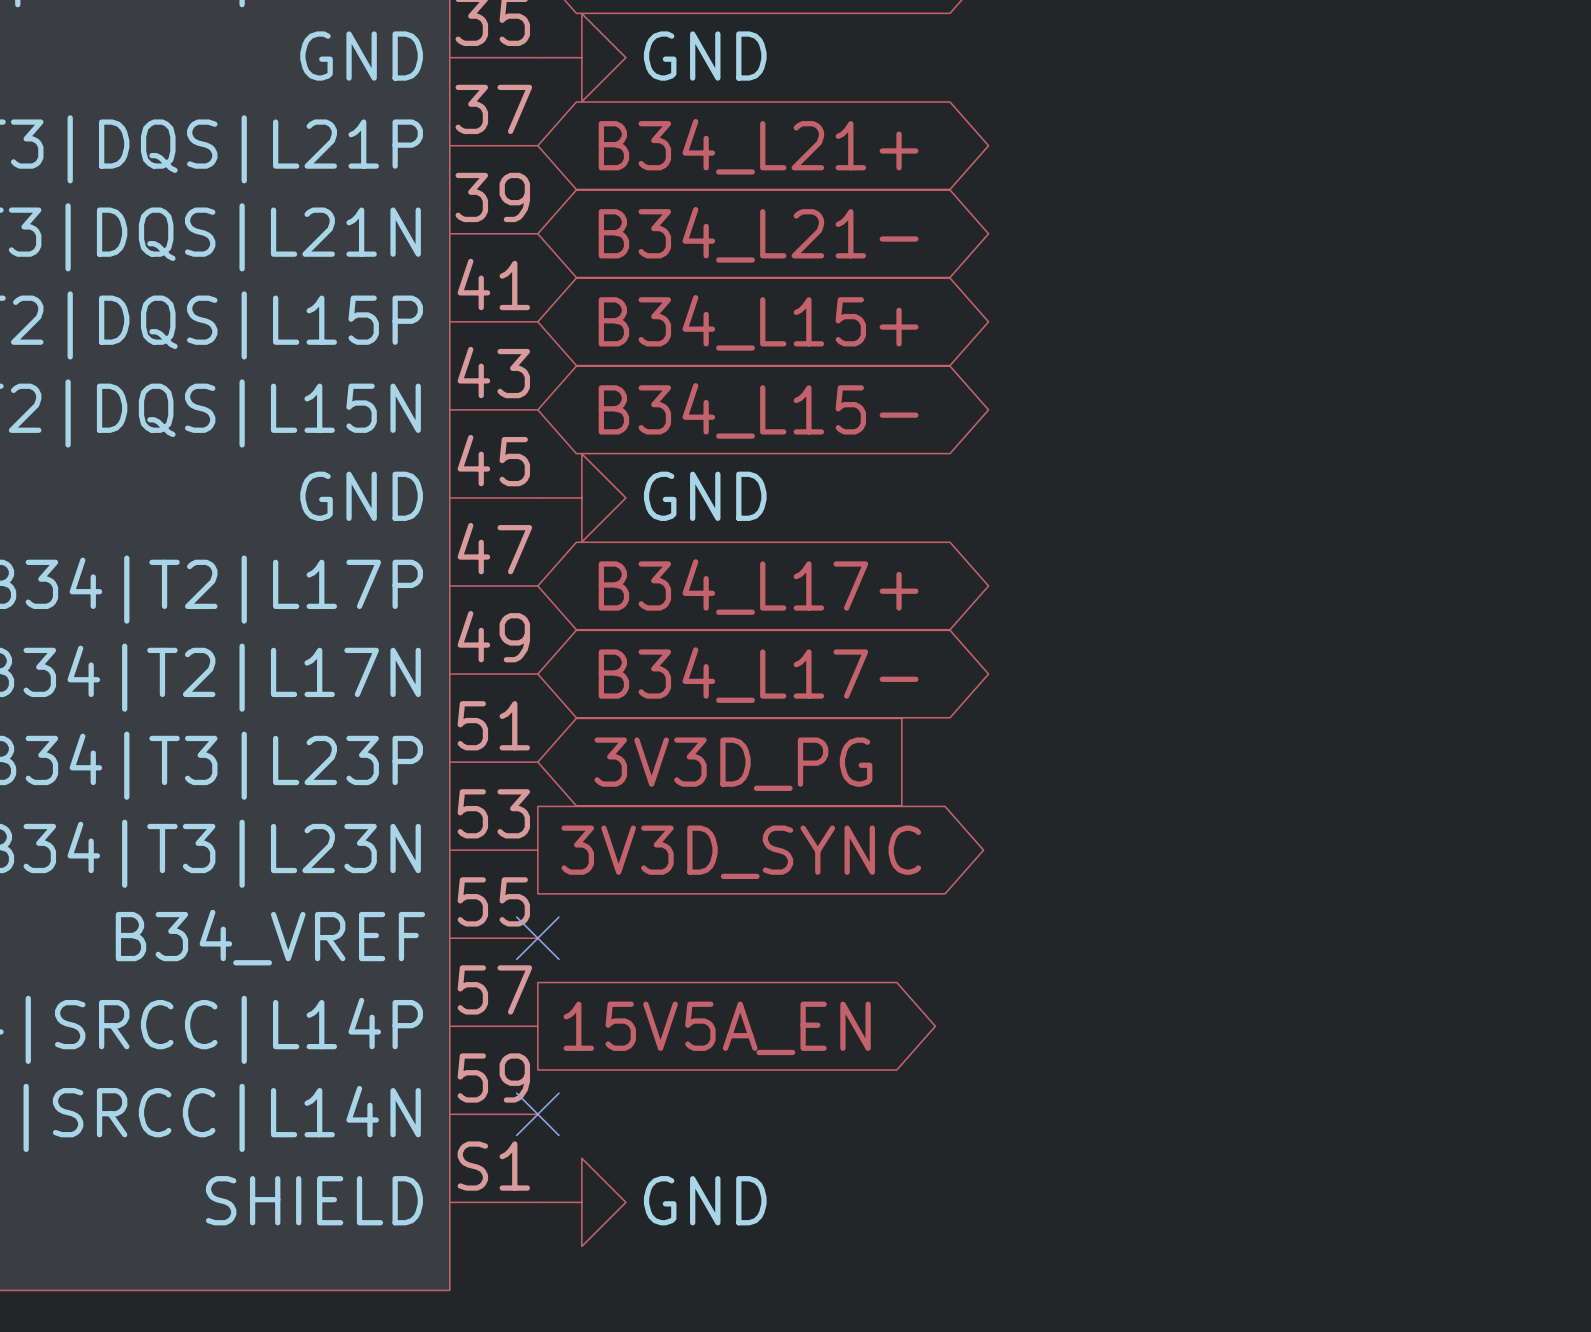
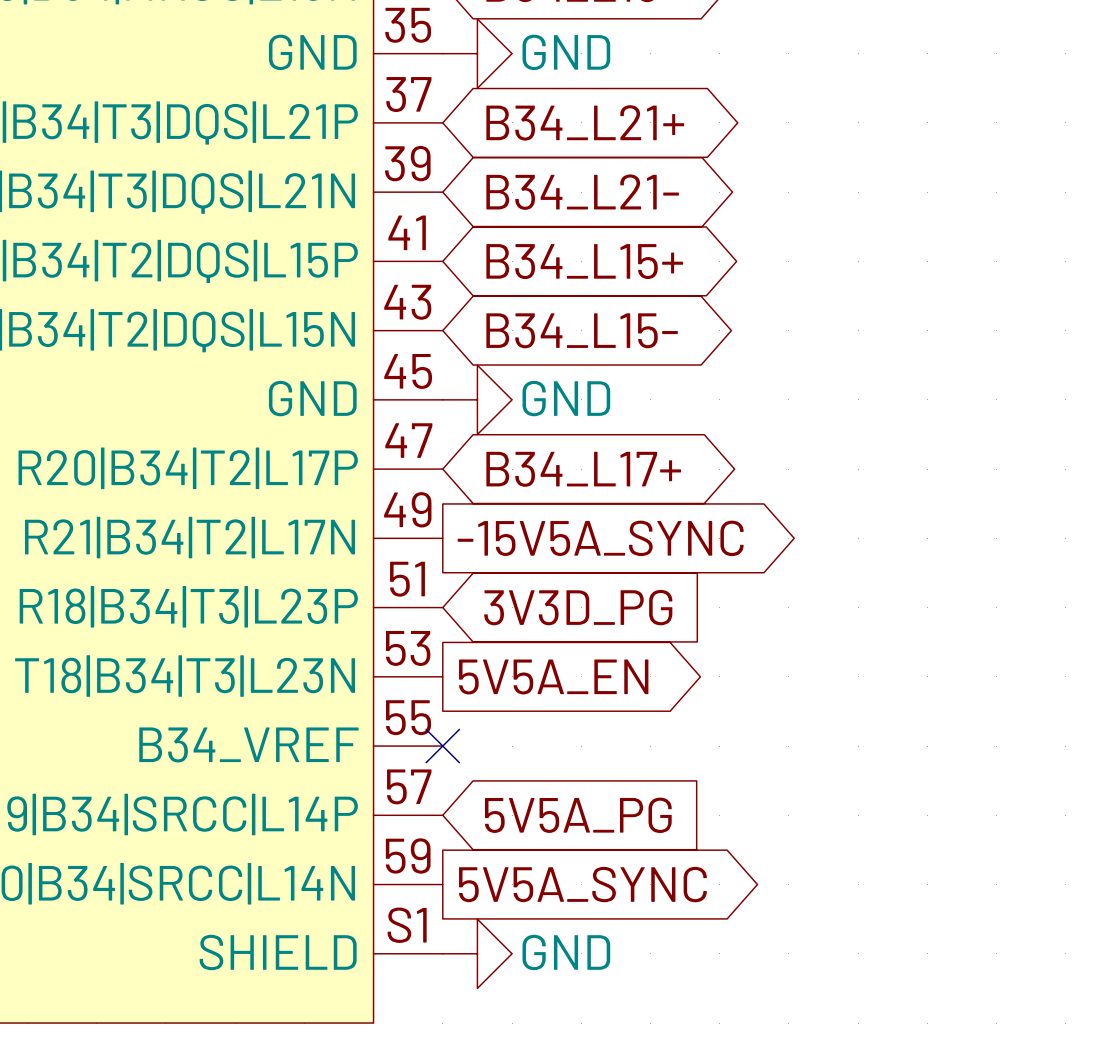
global label shape: bidirectional (758, 675) -> output (600, 538)
global label: B34_L17- (758, 675) -> -15V5A_SYNC (600, 538)
global label: 3V3D_SYNC (741, 852) -> 5V5A_EN (553, 677)
global label shape: output (717, 1028) -> input (578, 815)
global label: 15V5A_EN (717, 1028) -> 5V5A_PG (578, 815)
no-connect mark: (537, 1114) -> none
global label: none -> 5V5A_SYNC (582, 884)

